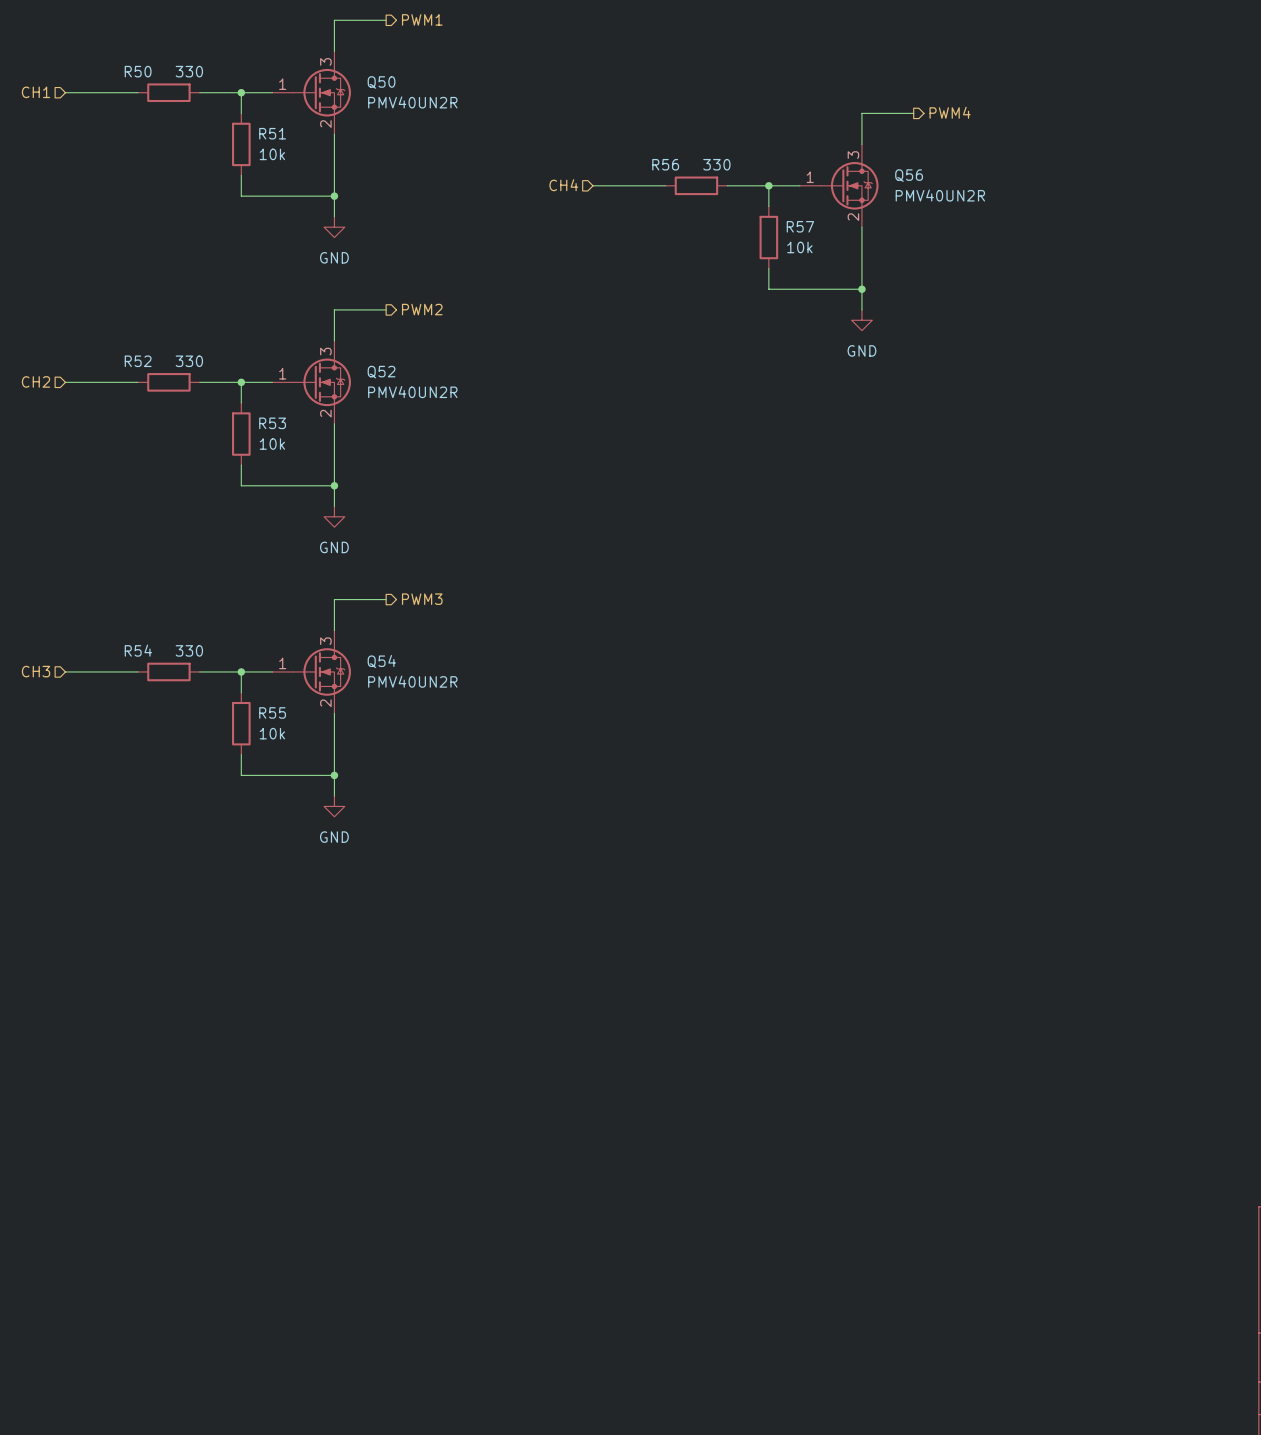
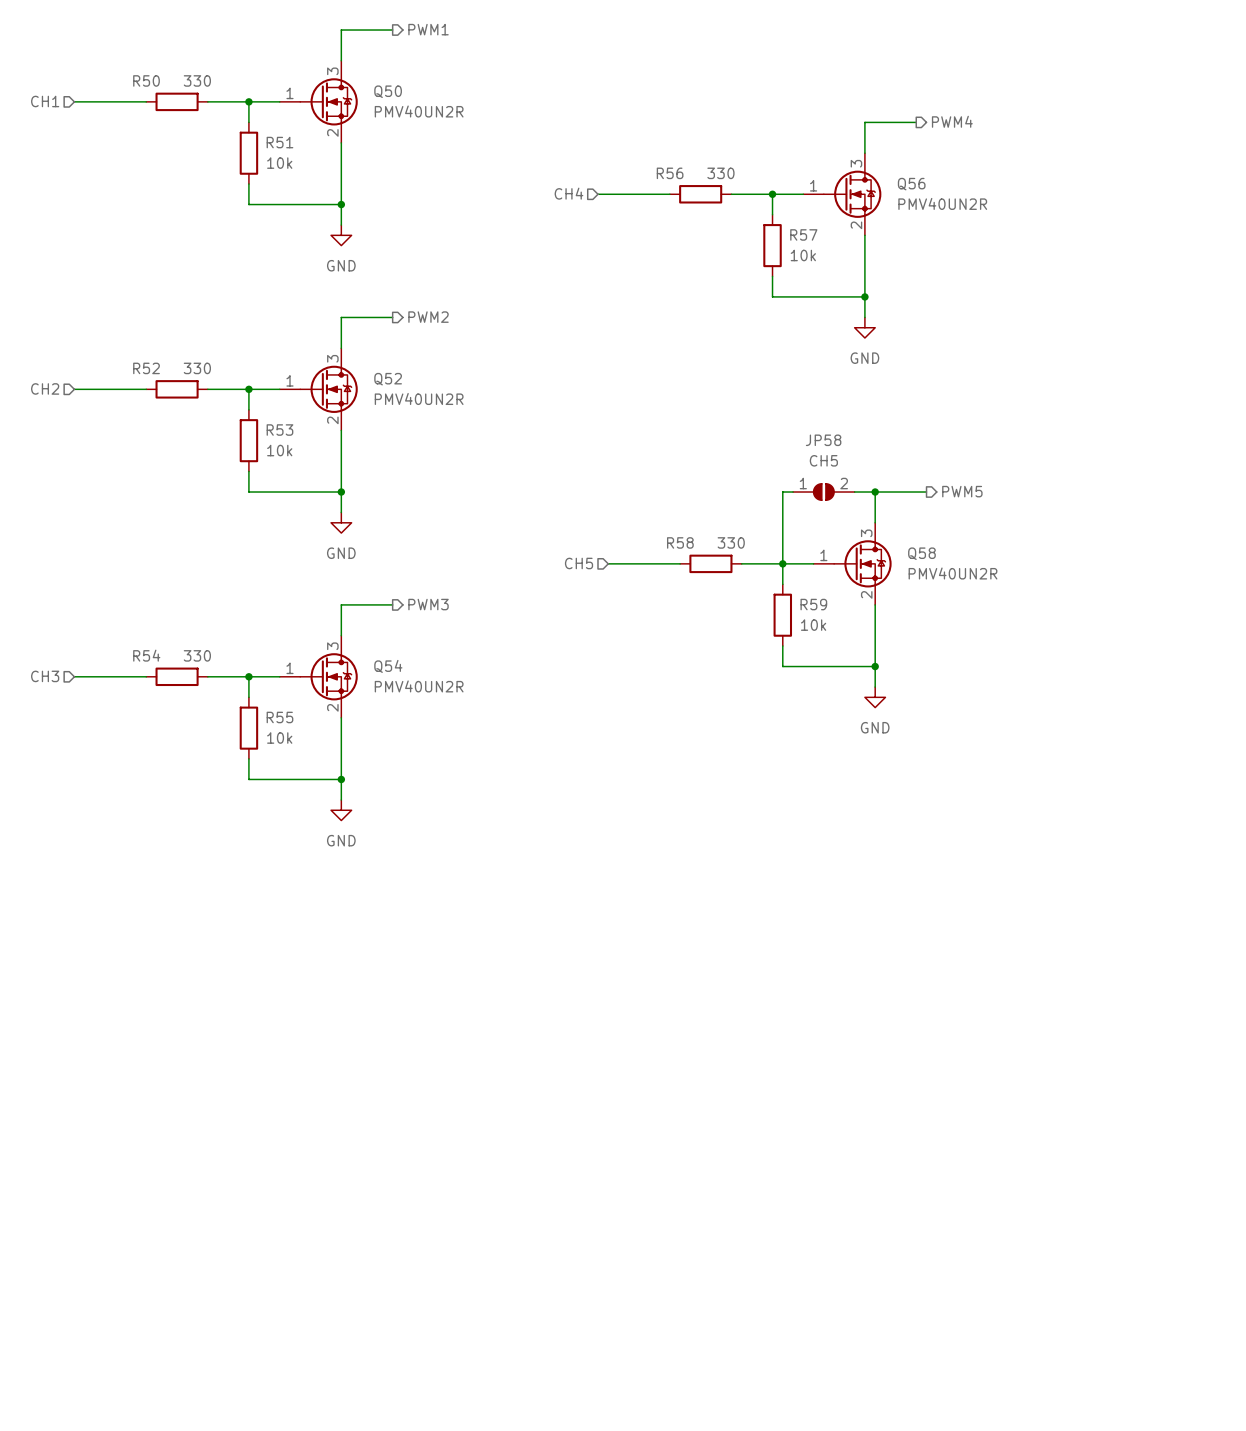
wire: none -> (793, 492) (782, 492) (782, 584)
JP58: none -> CH5 (823, 492)
wire: none -> (854, 492) (926, 492)
wire: none -> (875, 492) (875, 522)
junction: none -> (875, 492)
hierarchical label: none -> PWM5 (962, 491)
hierarchical label: none -> CH5 (579, 563)
wire: none -> (608, 563) (680, 563)
R58: none -> 330 (710, 563)
wire: none -> (741, 563) (813, 563)
junction: none -> (782, 563)
Q58: none -> PMV40UN2R (852, 563)
wire: none -> (875, 604) (875, 687)
R59: none -> 10k (782, 615)
wire: none -> (782, 646) (782, 666) (875, 666)
junction: none -> (875, 666)
power symbol: none -> GND (875, 697)

